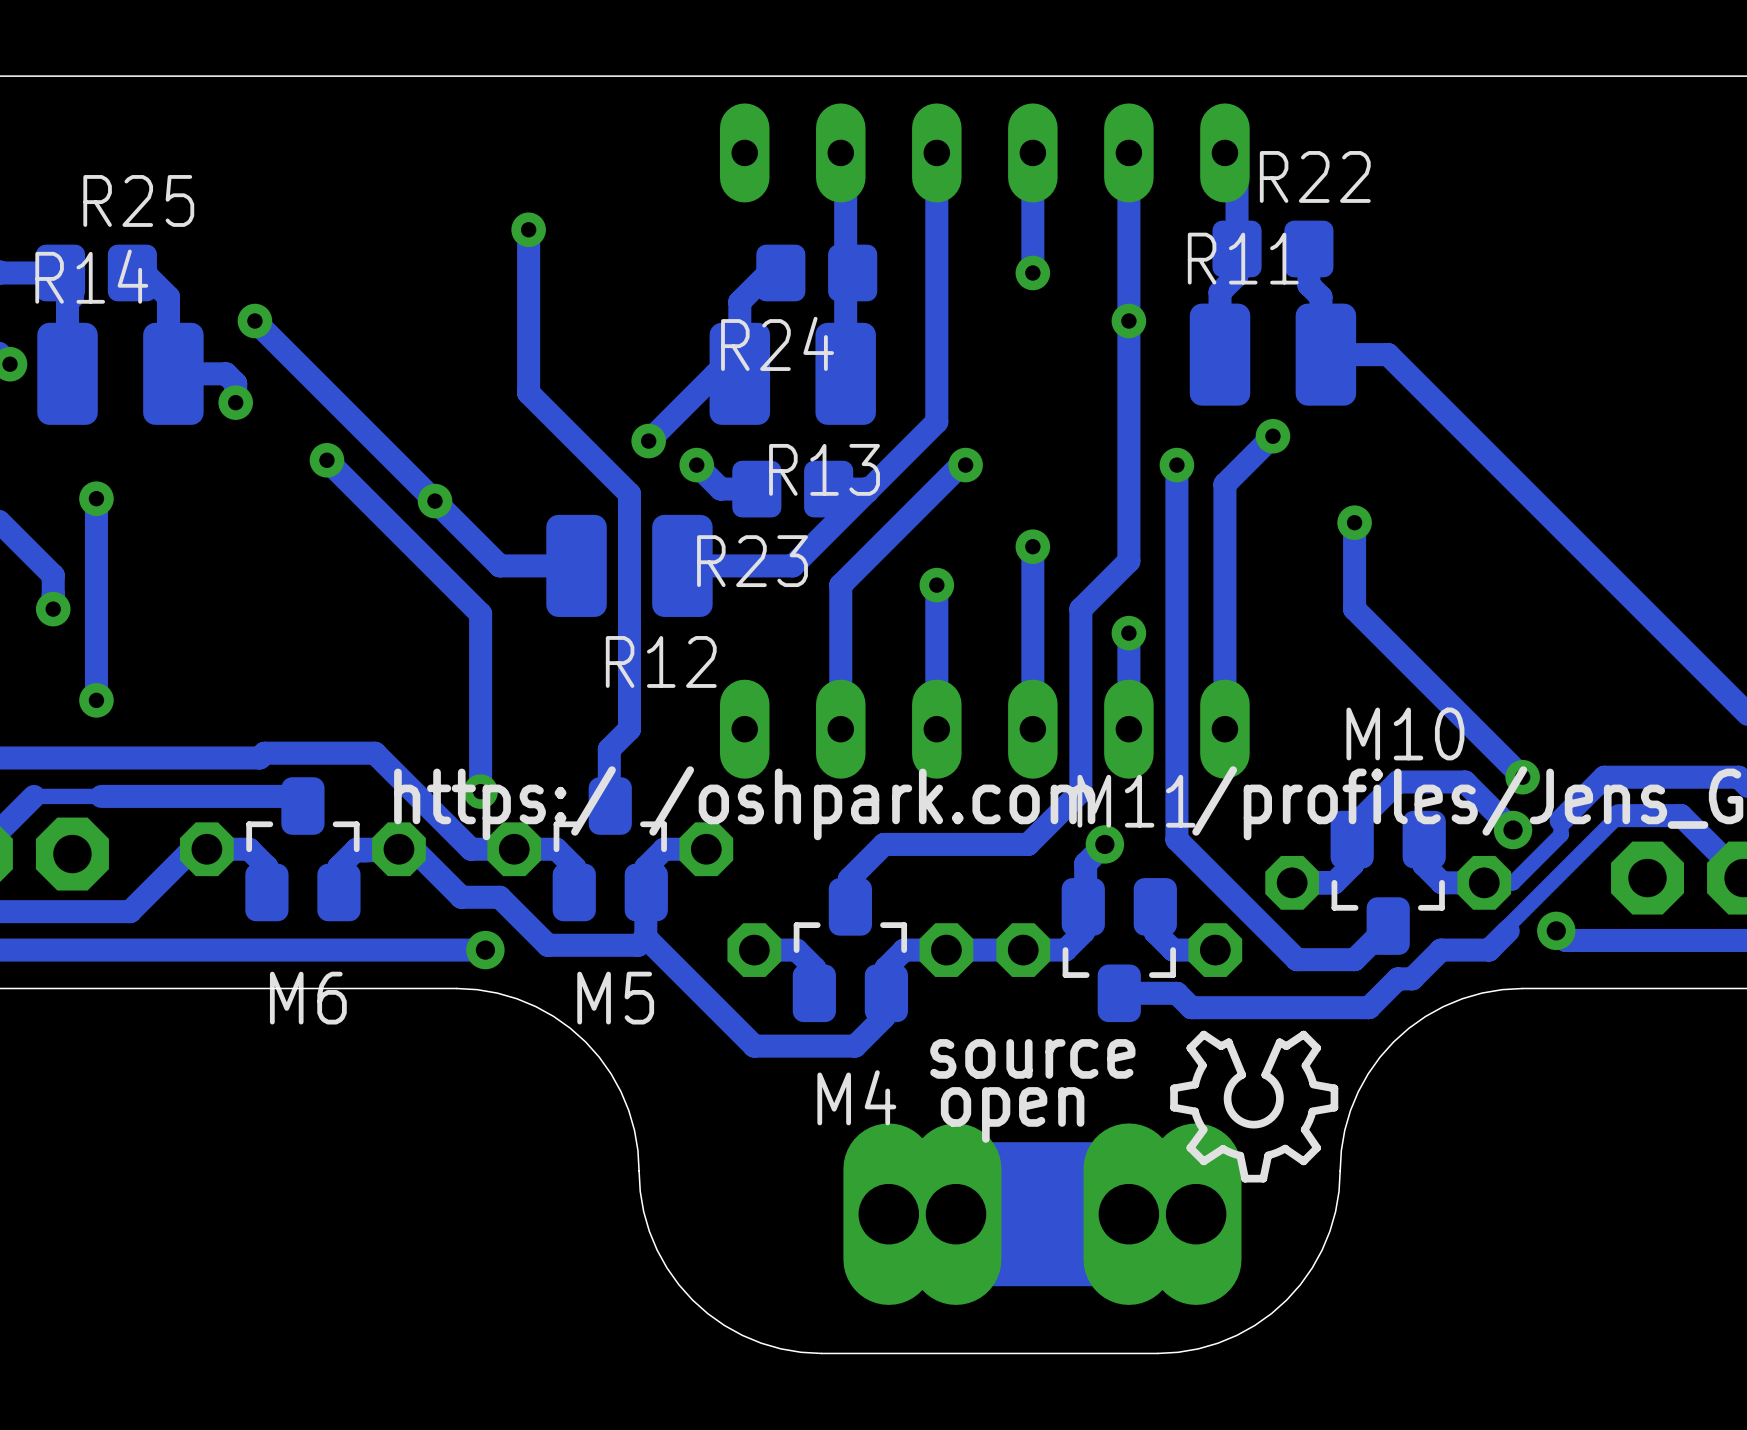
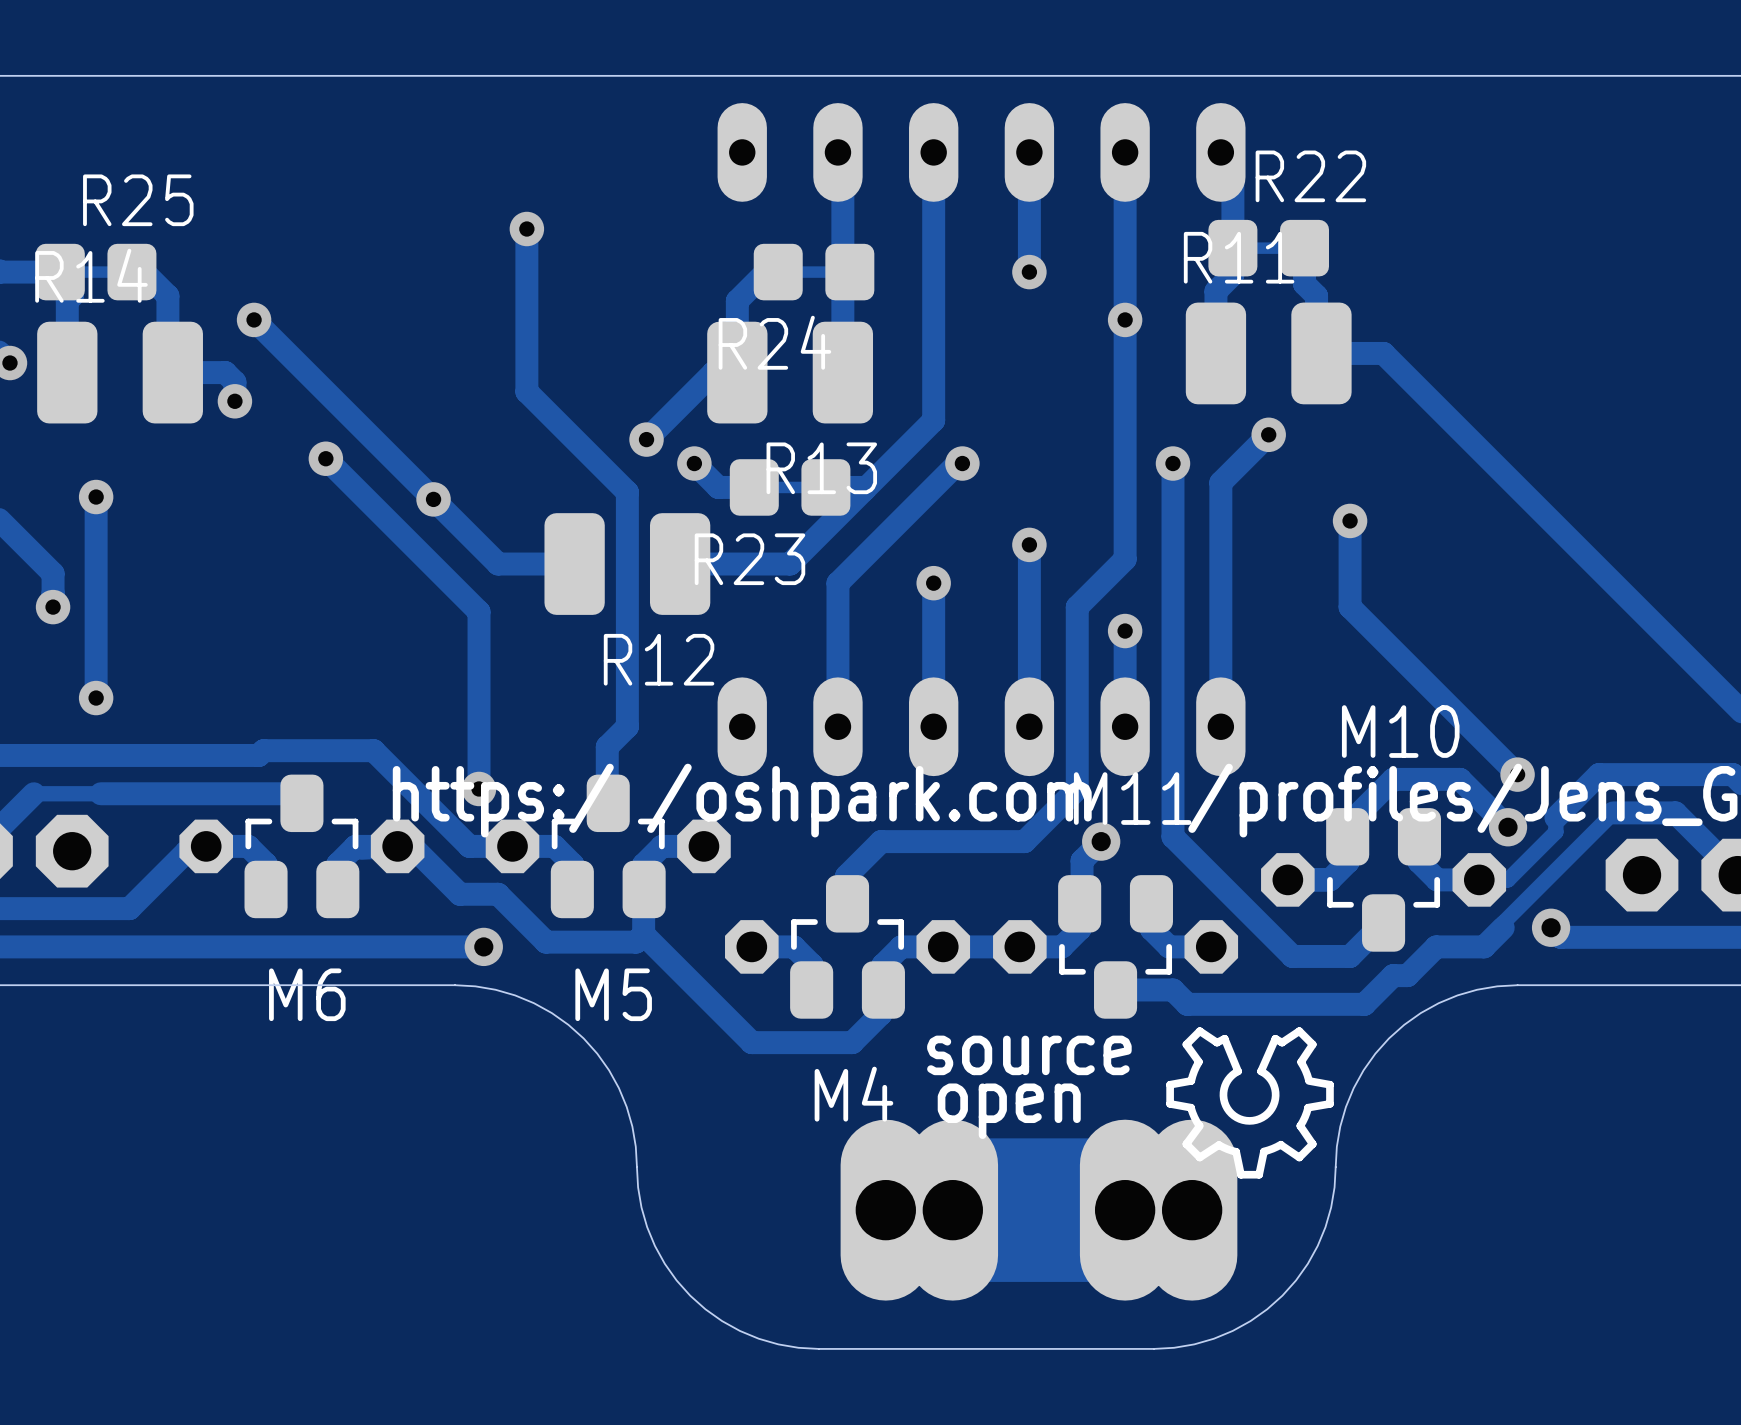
R22 footprint: [1212, 220, 1334, 278] -> [1208, 219, 1330, 277]
R25 footprint: [35, 244, 157, 302] -> [35, 243, 157, 301]
R24 footprint: [756, 244, 878, 302] -> [753, 243, 875, 301]
R23 footprint: [732, 460, 854, 518] -> [729, 459, 851, 516]

